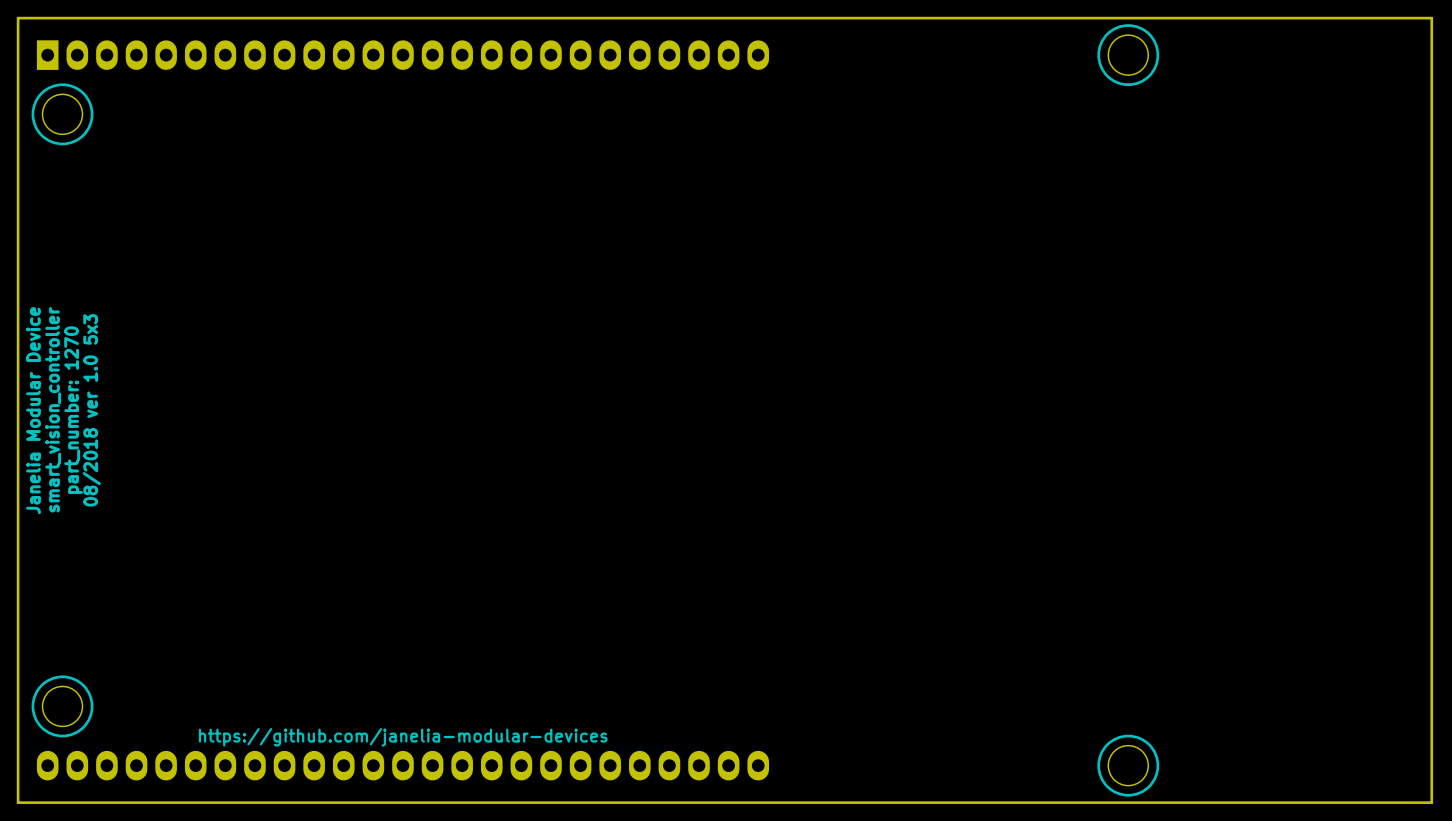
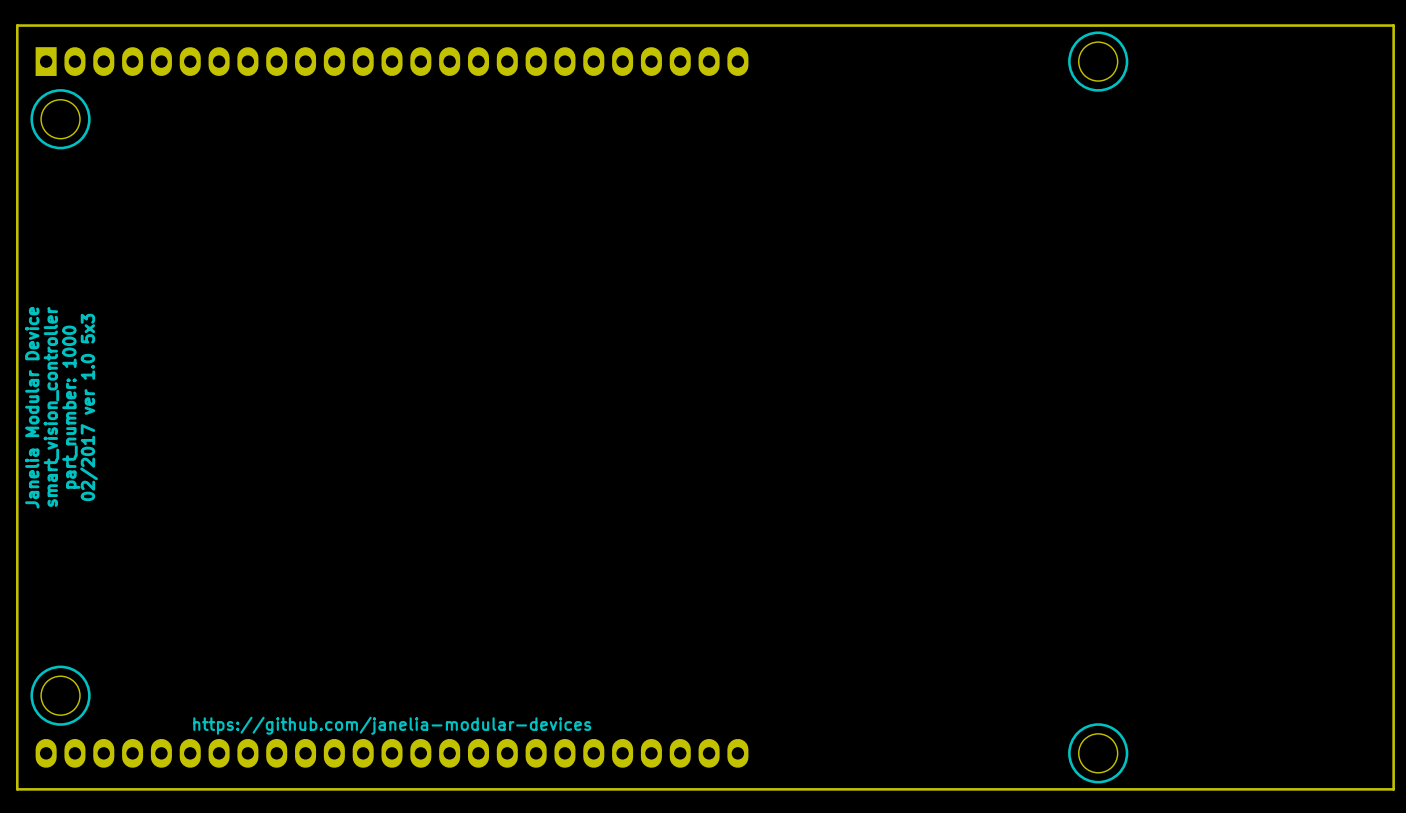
text: part_number: 1270 (73, 410) -> part_number: 1000 (71, 407)
text: 08/2018 ver 1.0 5x3 (91, 410) -> 02/2017 ver 1.0 5x3 (89, 407)

